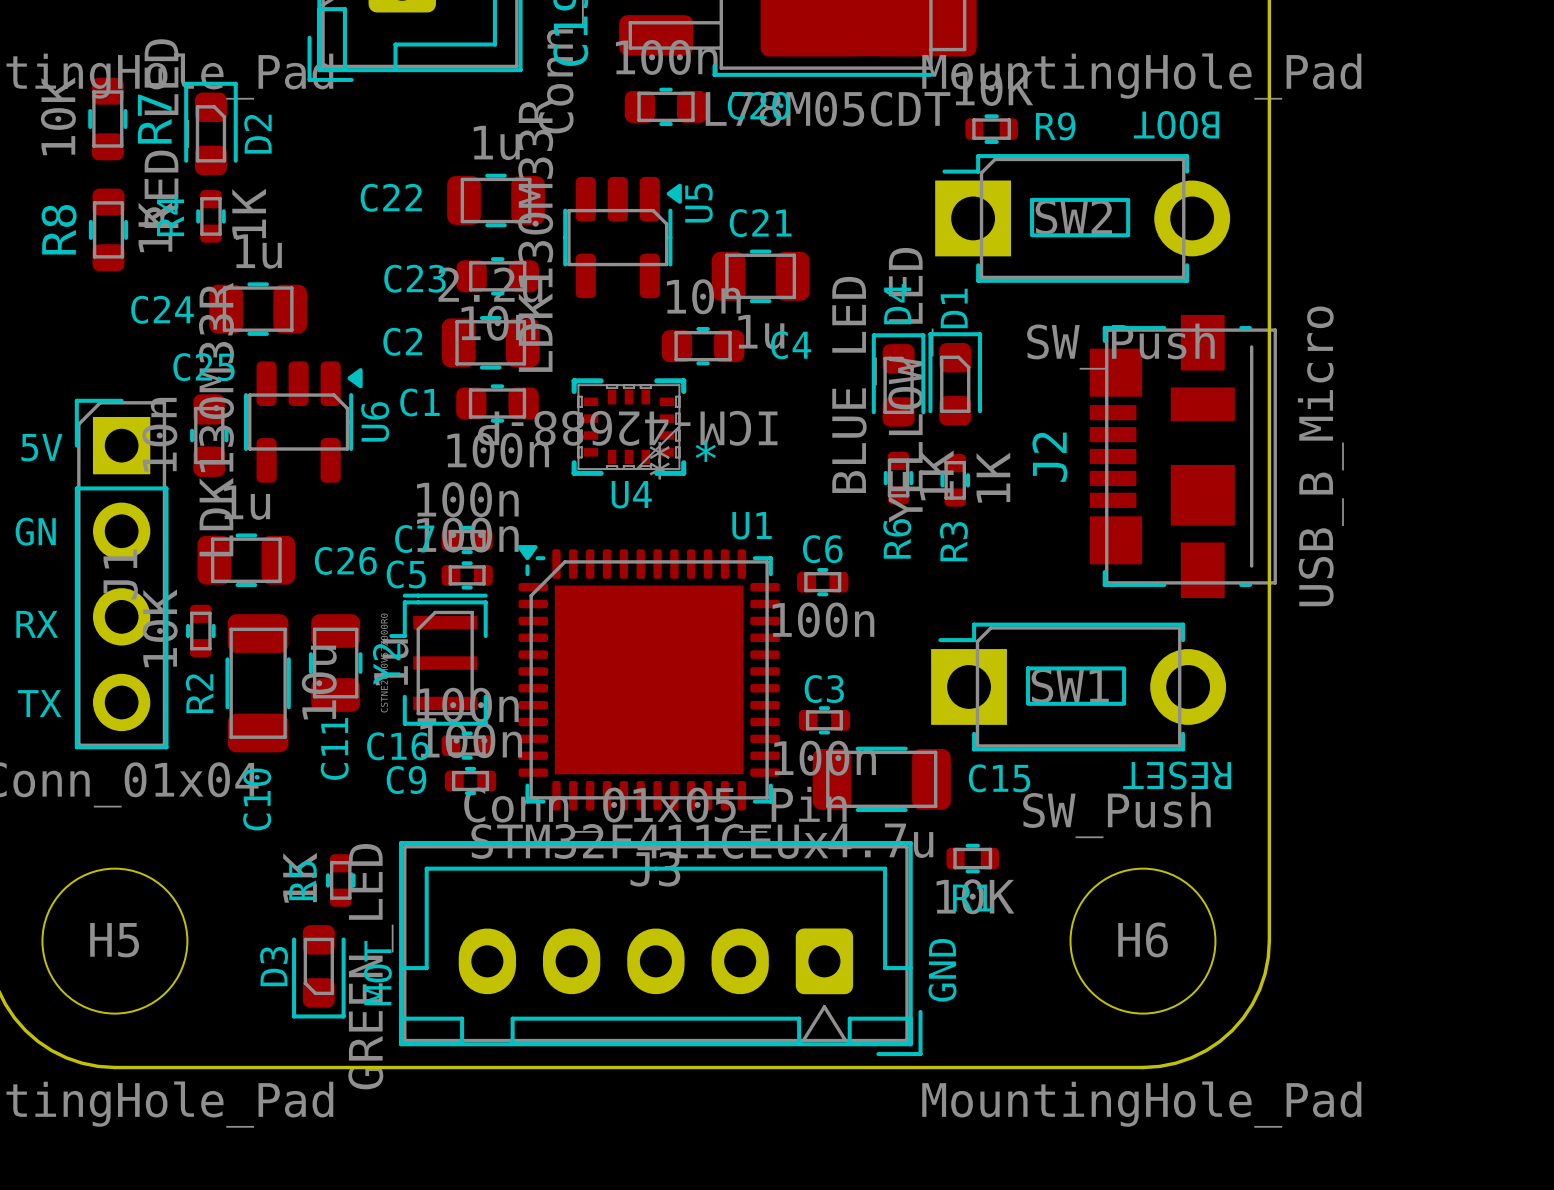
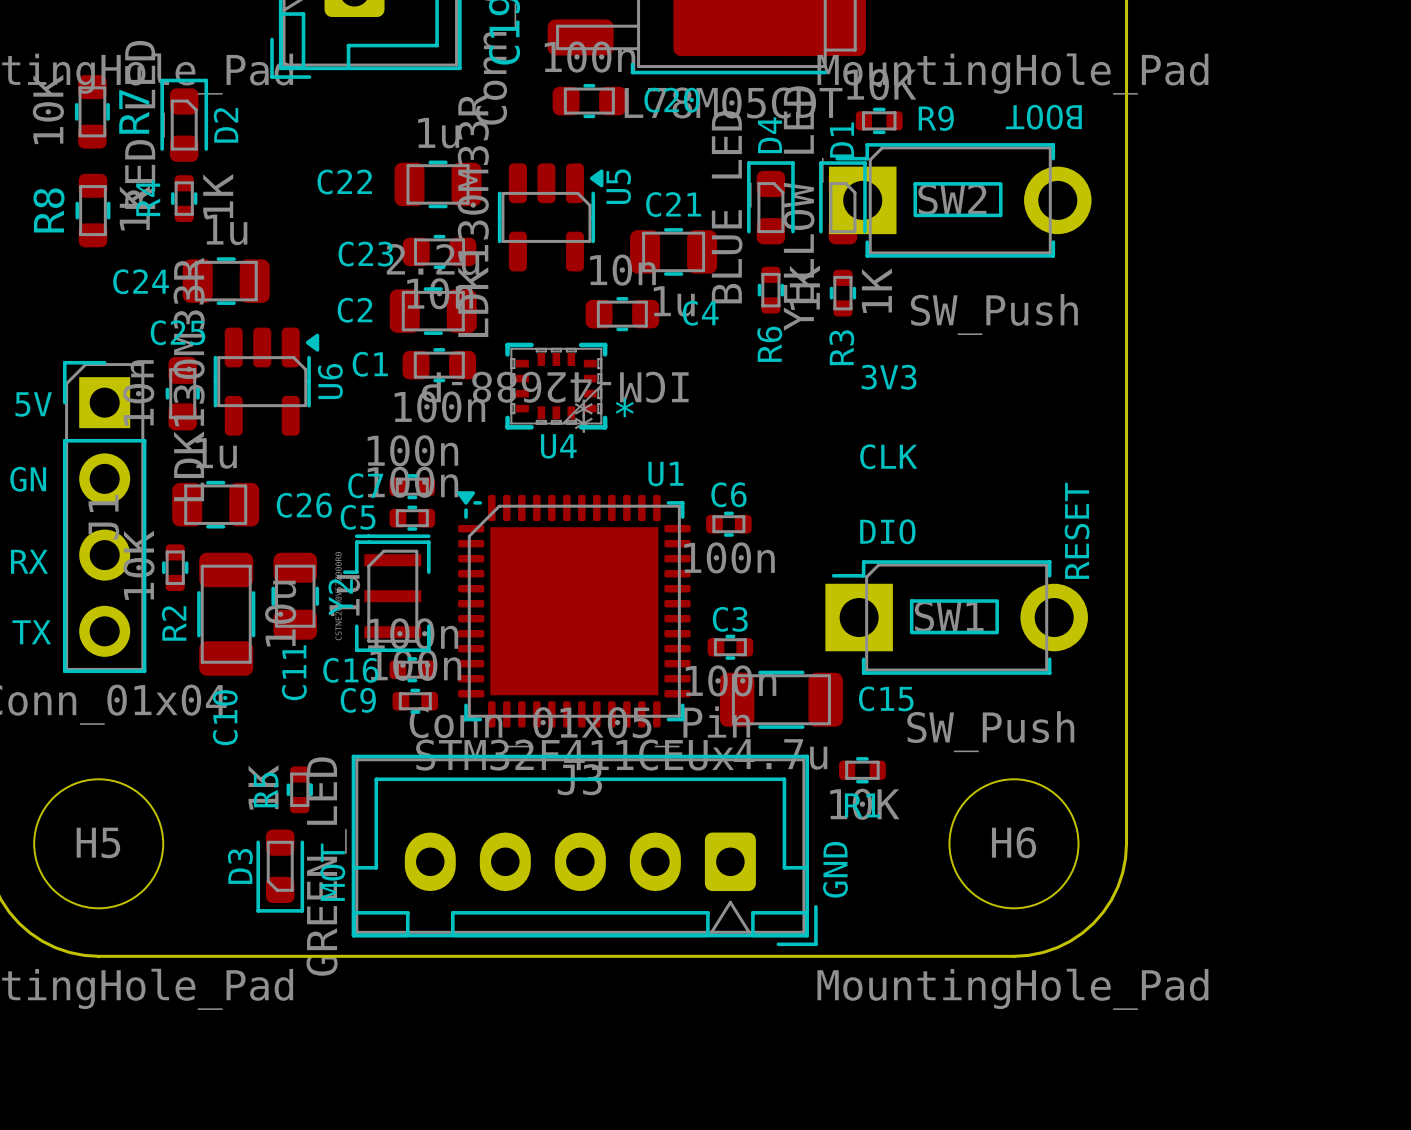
D1 position: (955, 378) -> (842, 202)
D4 position: (898, 379) -> (770, 202)
text: none -> 3V3 (889, 377)
J2: USB_B_Micro (1183, 456) -> none
R6 position: (898, 478) -> (770, 290)
R3 position: (955, 480) -> (842, 293)
text: none -> CLK (888, 456)
text: none -> DIO (887, 531)
text rotation: 0° (1177, 775) -> 90° clockwise (1077, 530)
text position: RESET (1177, 775) -> RESET (1077, 530)

